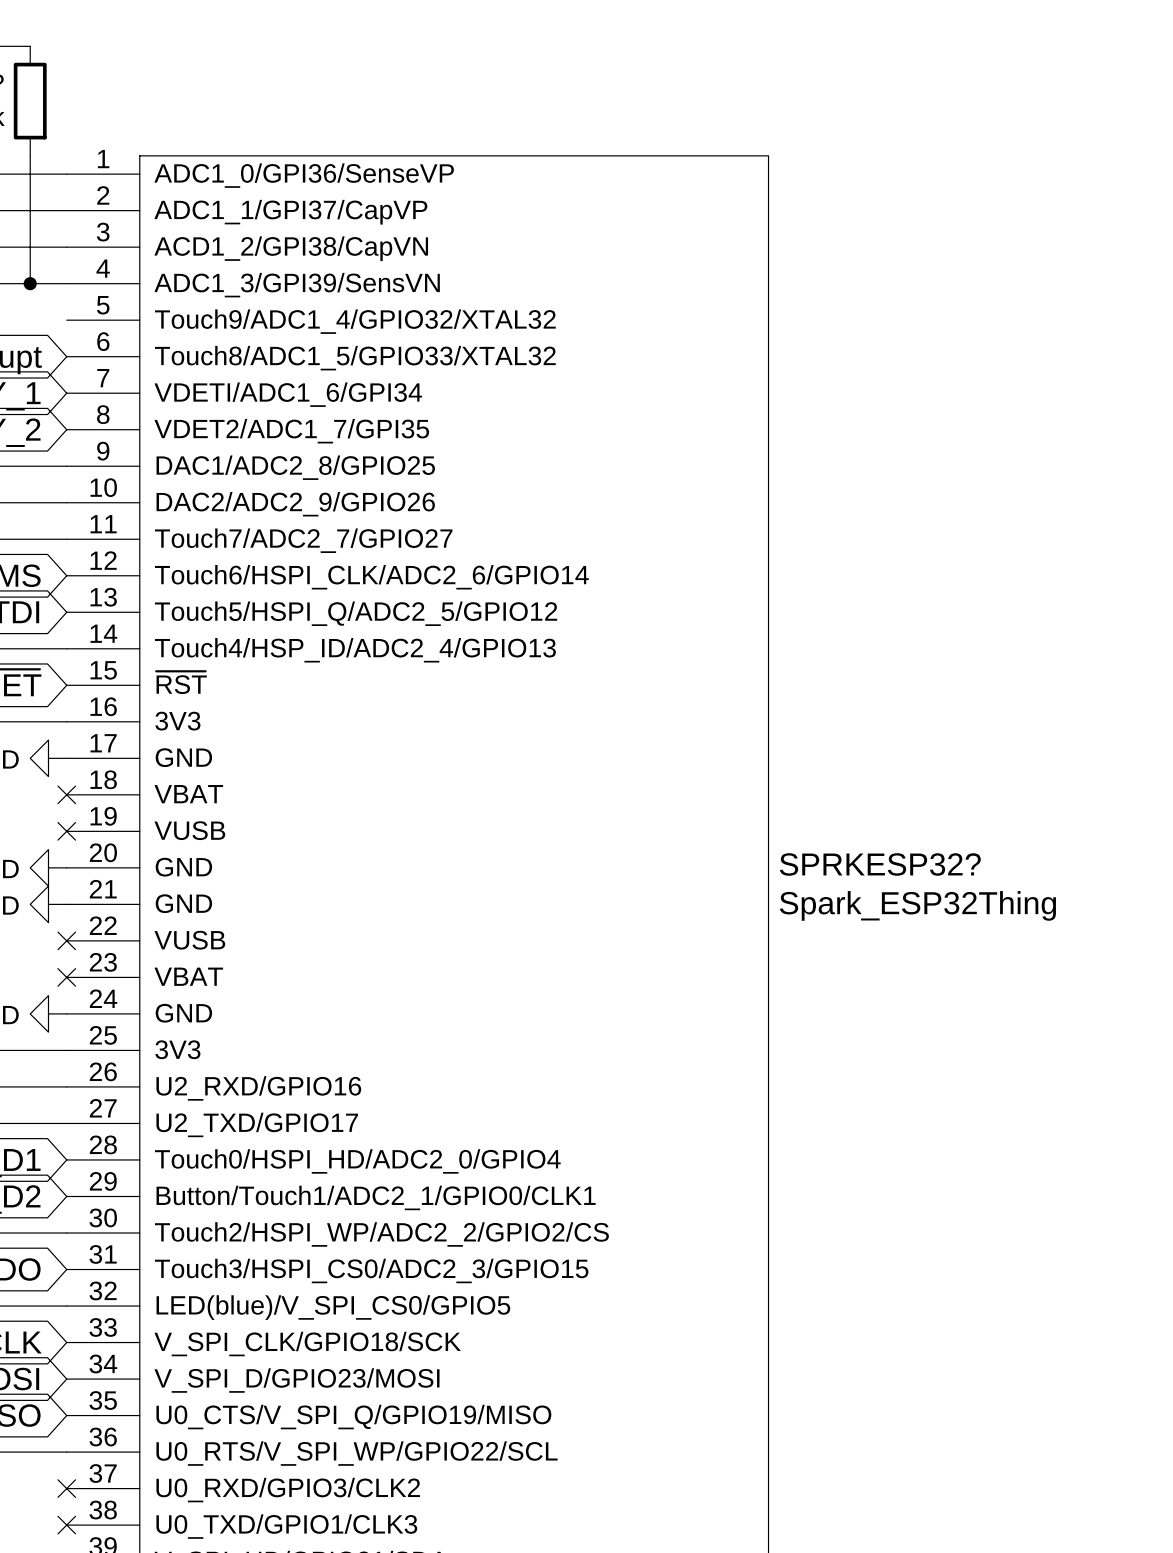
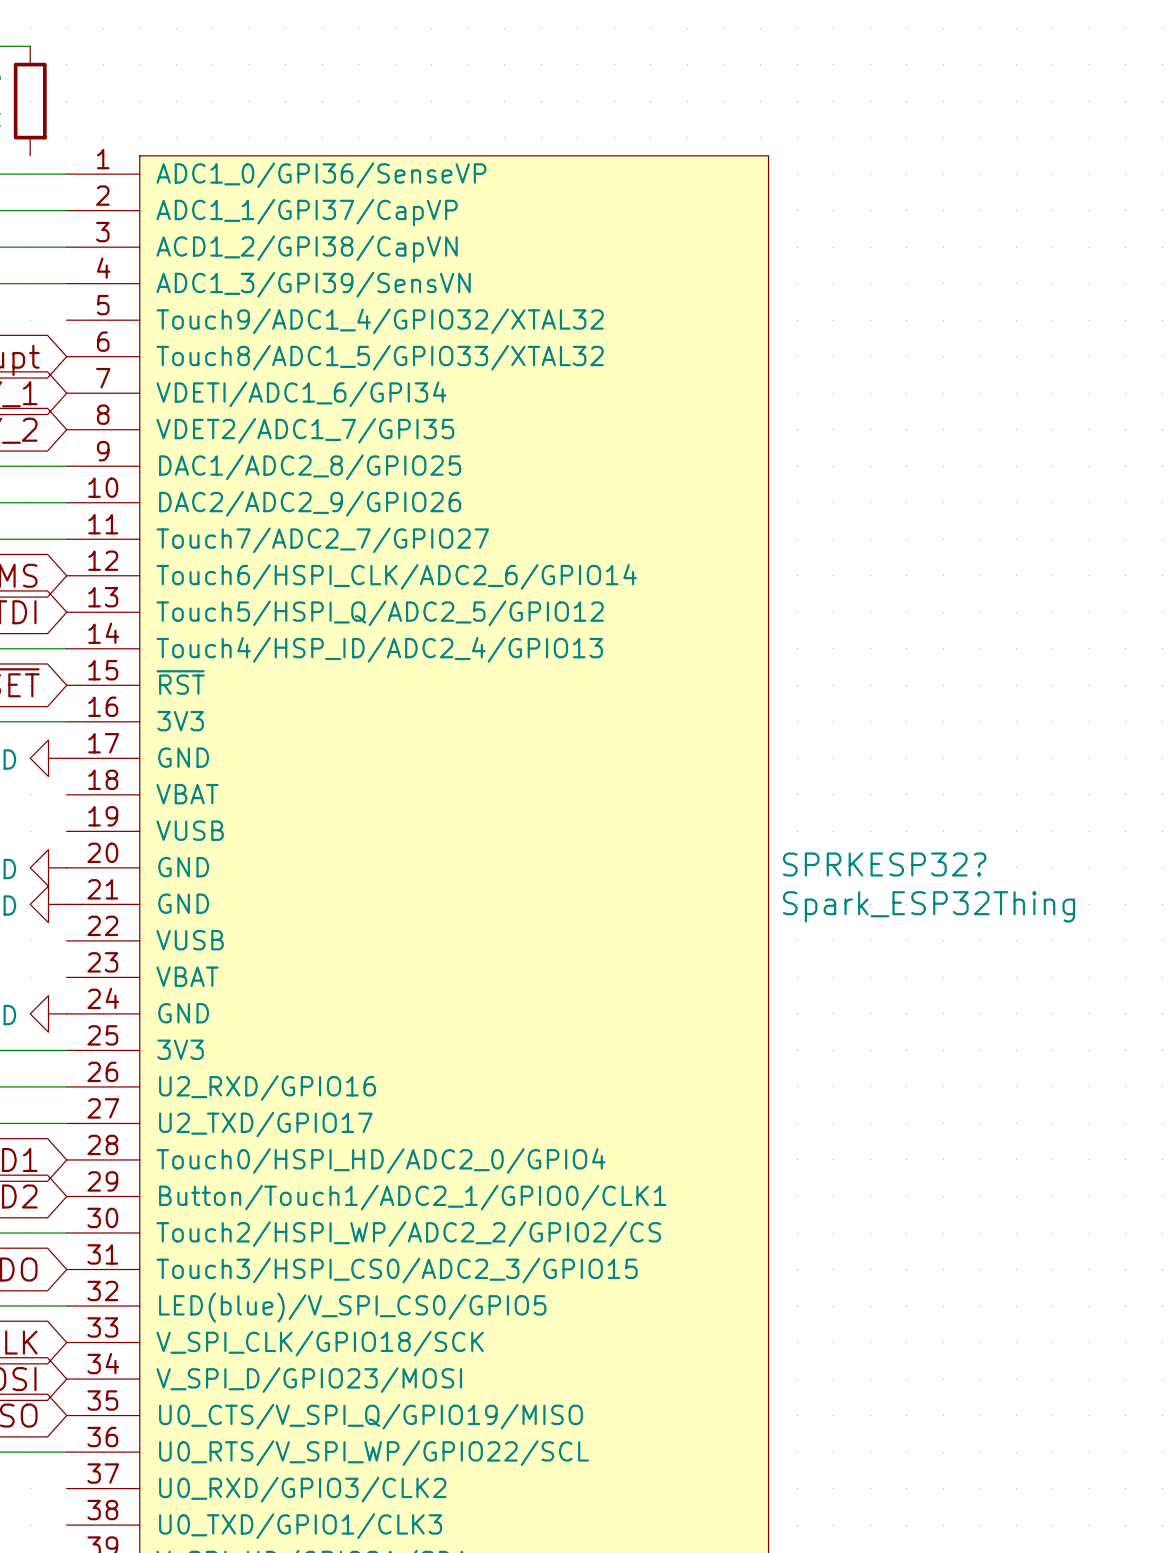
wire: (30, 155) (30, 283) -> none
junction: (30, 283) -> none
no-connect mark: (66, 794) -> none
no-connect mark: (66, 831) -> none
no-connect mark: (66, 940) -> none
no-connect mark: (66, 977) -> none
no-connect mark: (66, 1488) -> none
no-connect mark: (66, 1525) -> none

